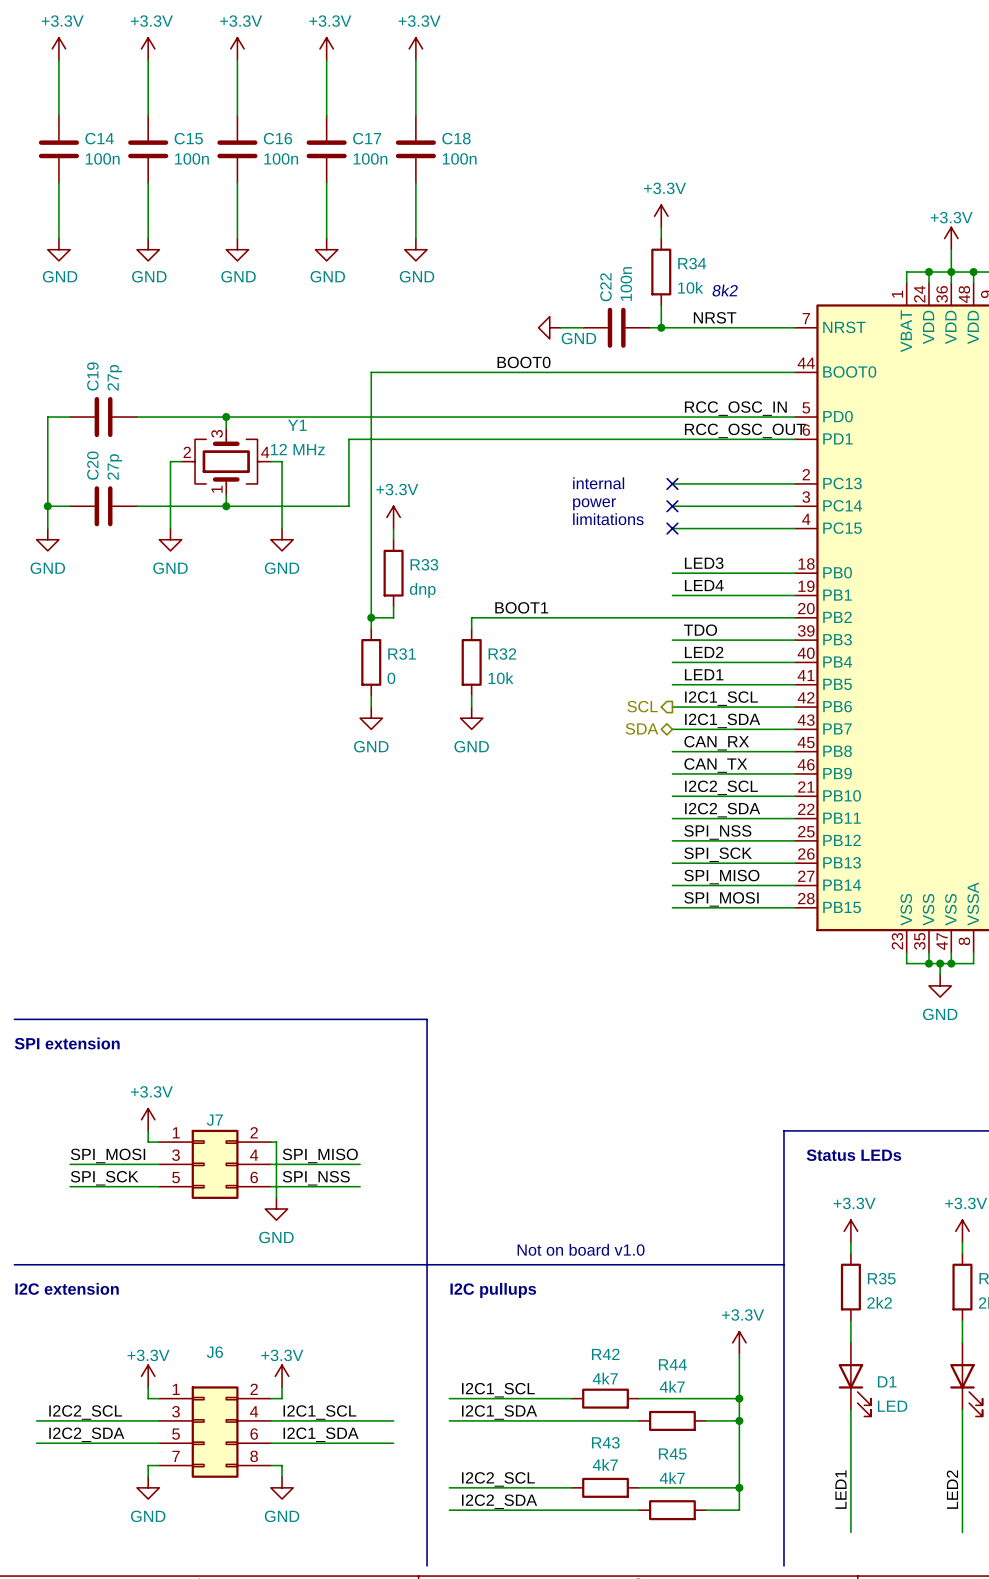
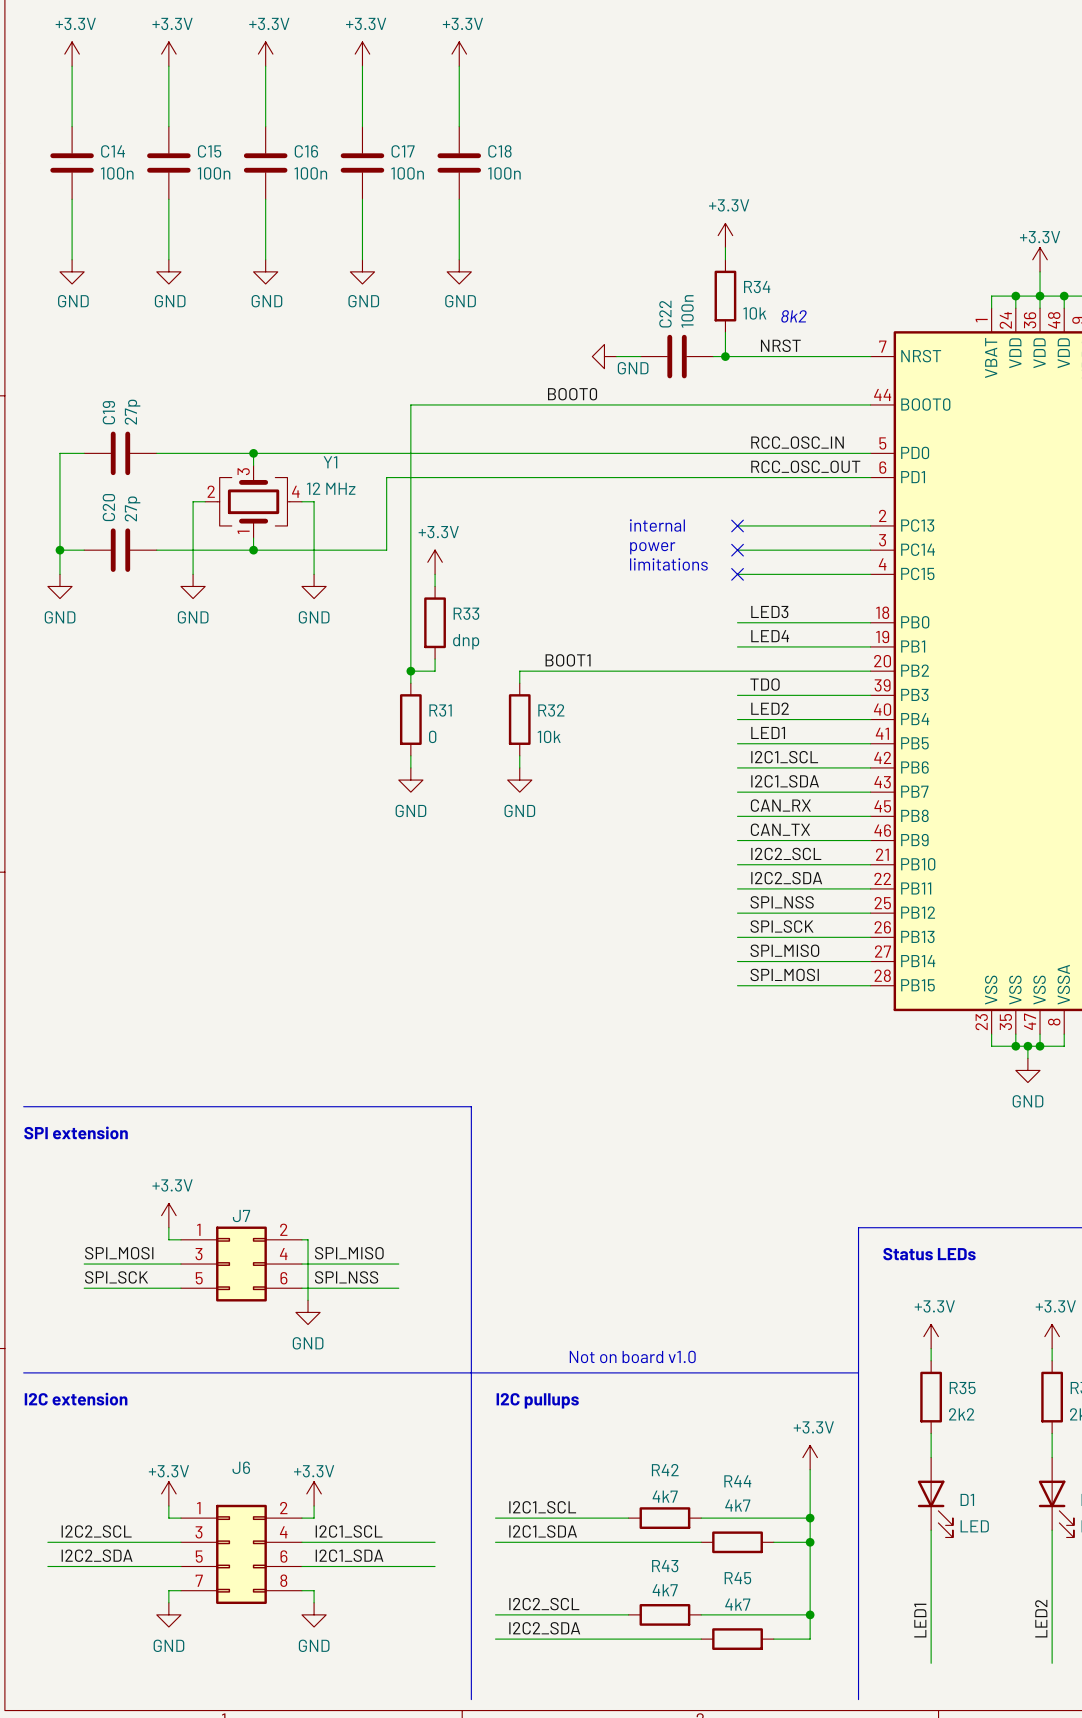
hierarchical label: SCL (642, 706) -> none
hierarchical label: SDA (641, 728) -> none

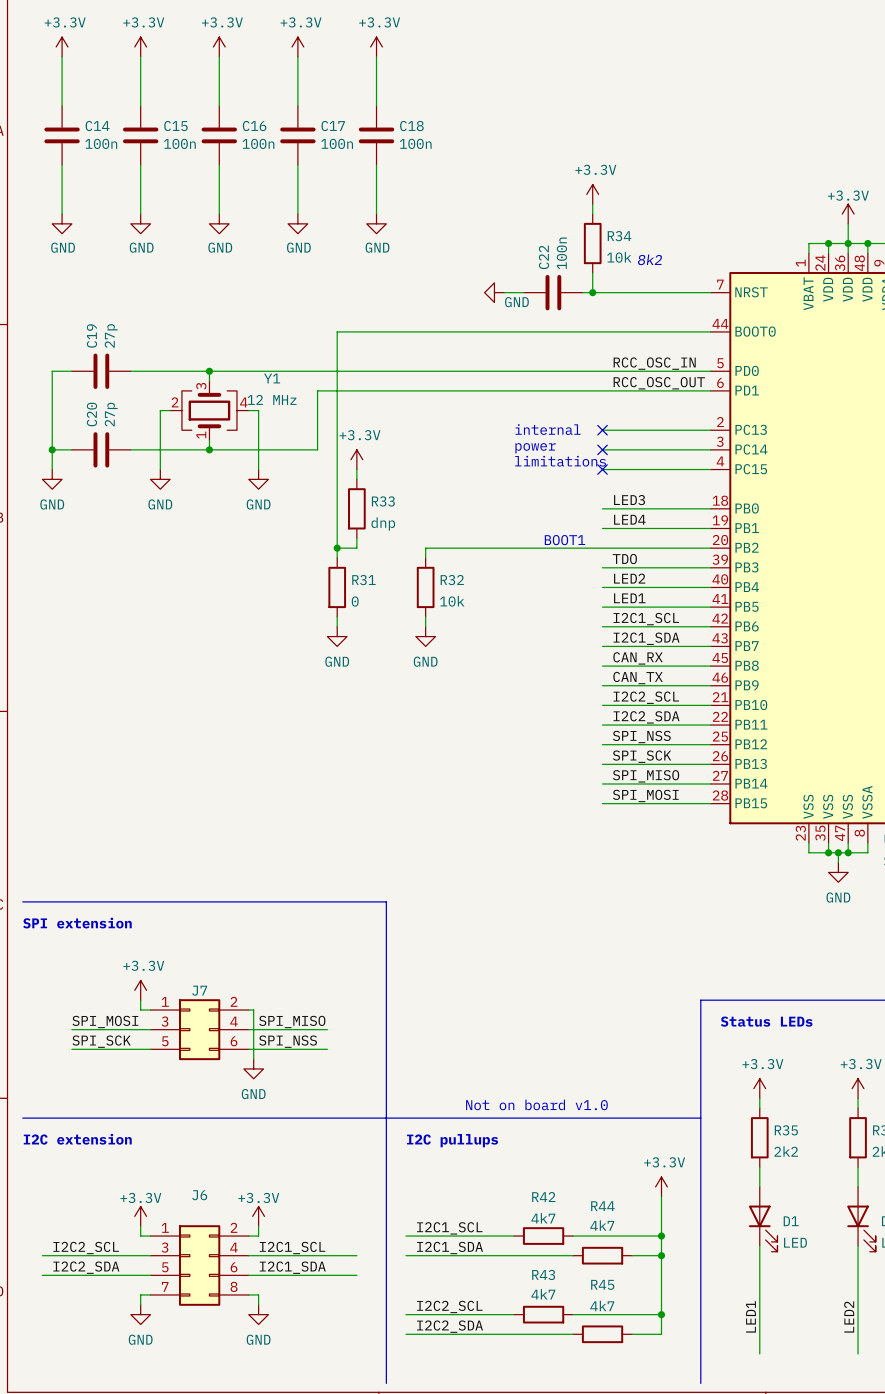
label: NRST (780, 345) -> none
label: BOOT0 (572, 394) -> none
label: BOOT1 (568, 660) -> none
text: none -> BOOT1 (564, 540)

